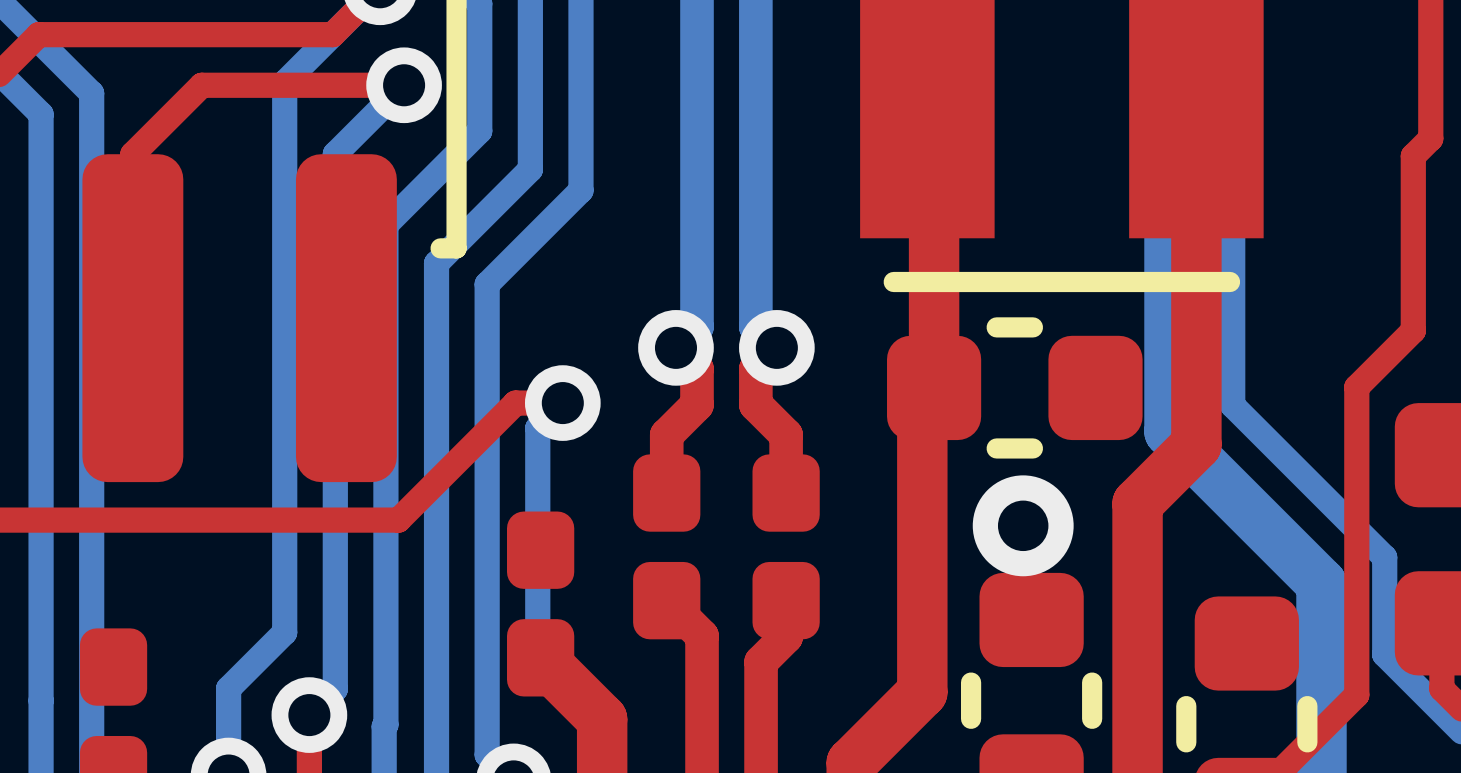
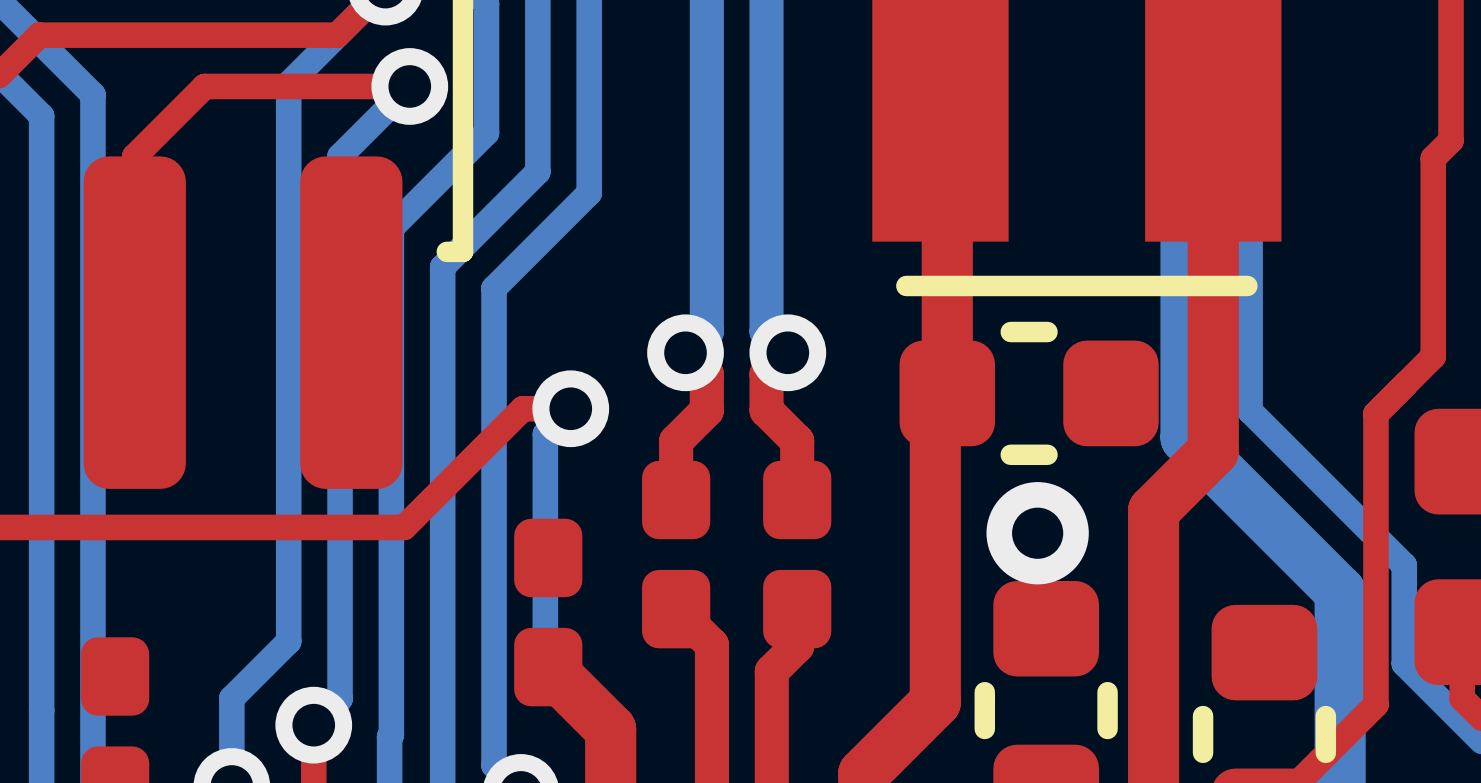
top track: (1413, 330) (1356, 387) (1356, 408) -> (1433, 335) (1433, 356) (1375, 413)

